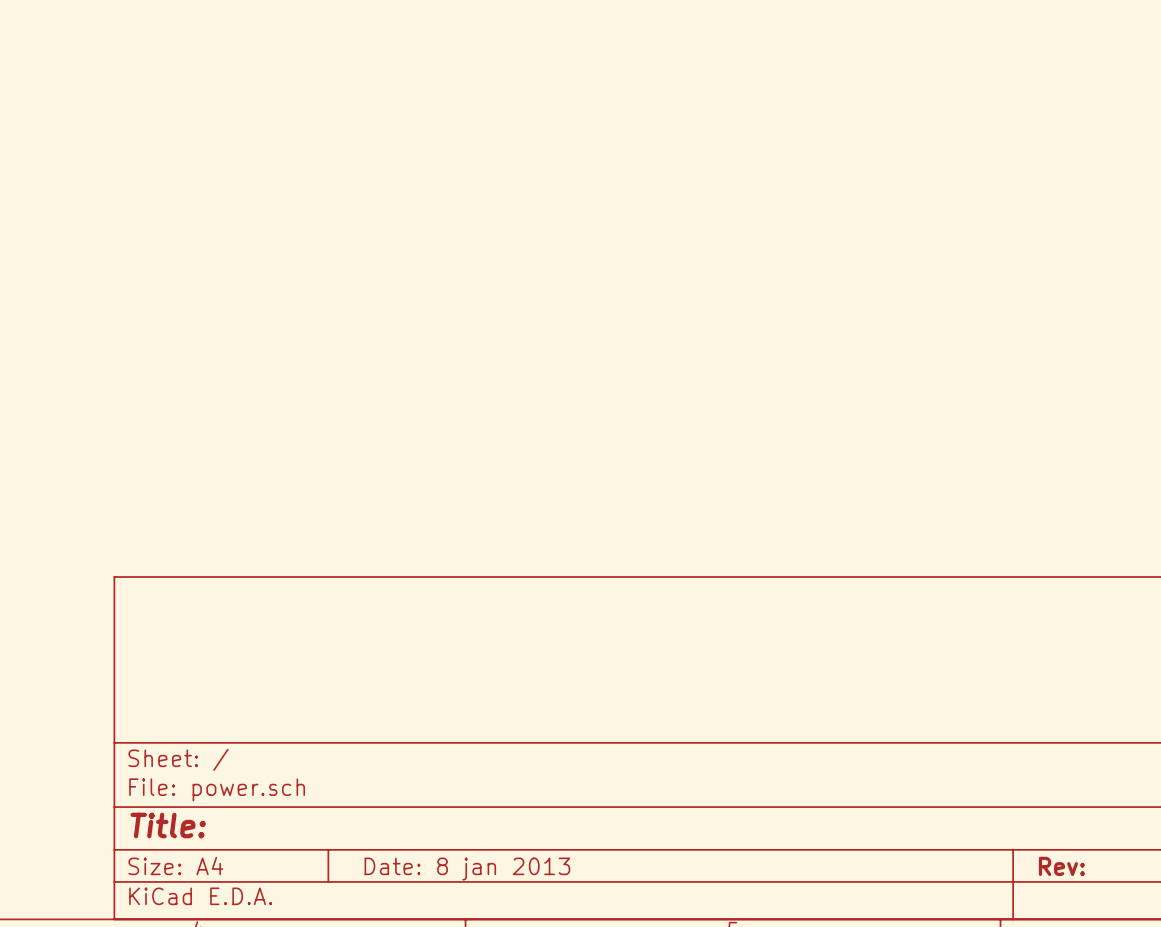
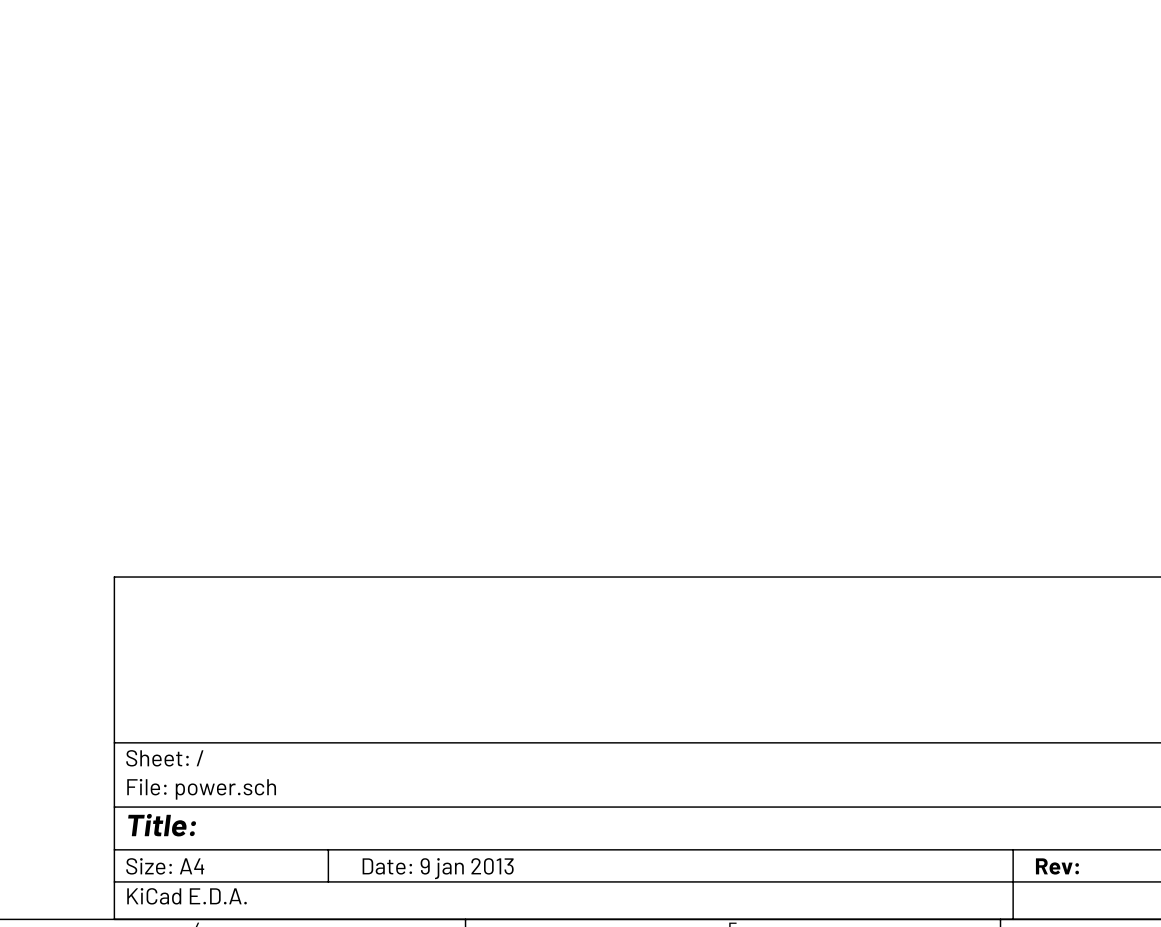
title block: Date: 8 jan 2013 (467, 869) -> Date: 9 jan 2013 (438, 868)

